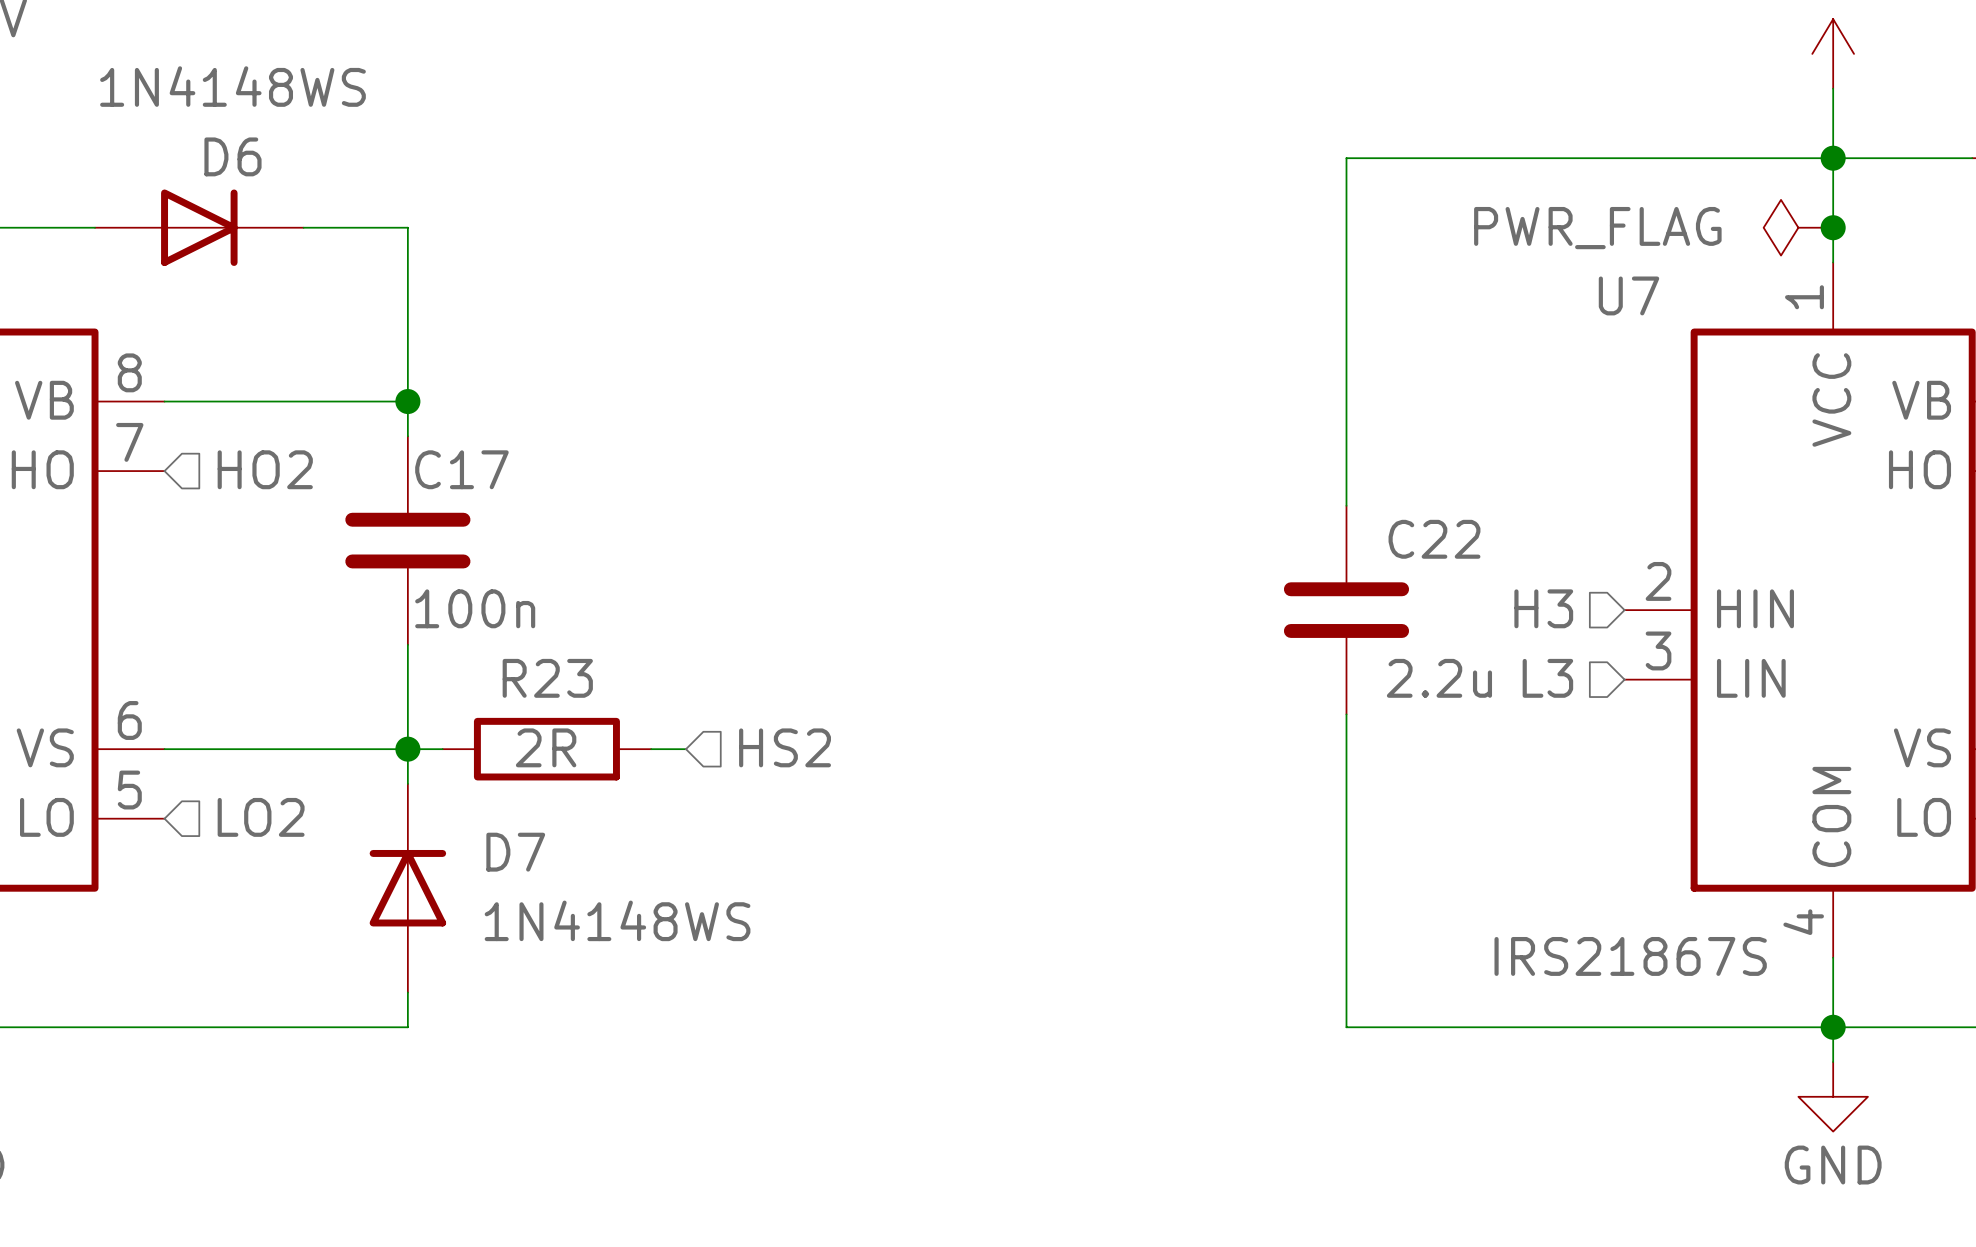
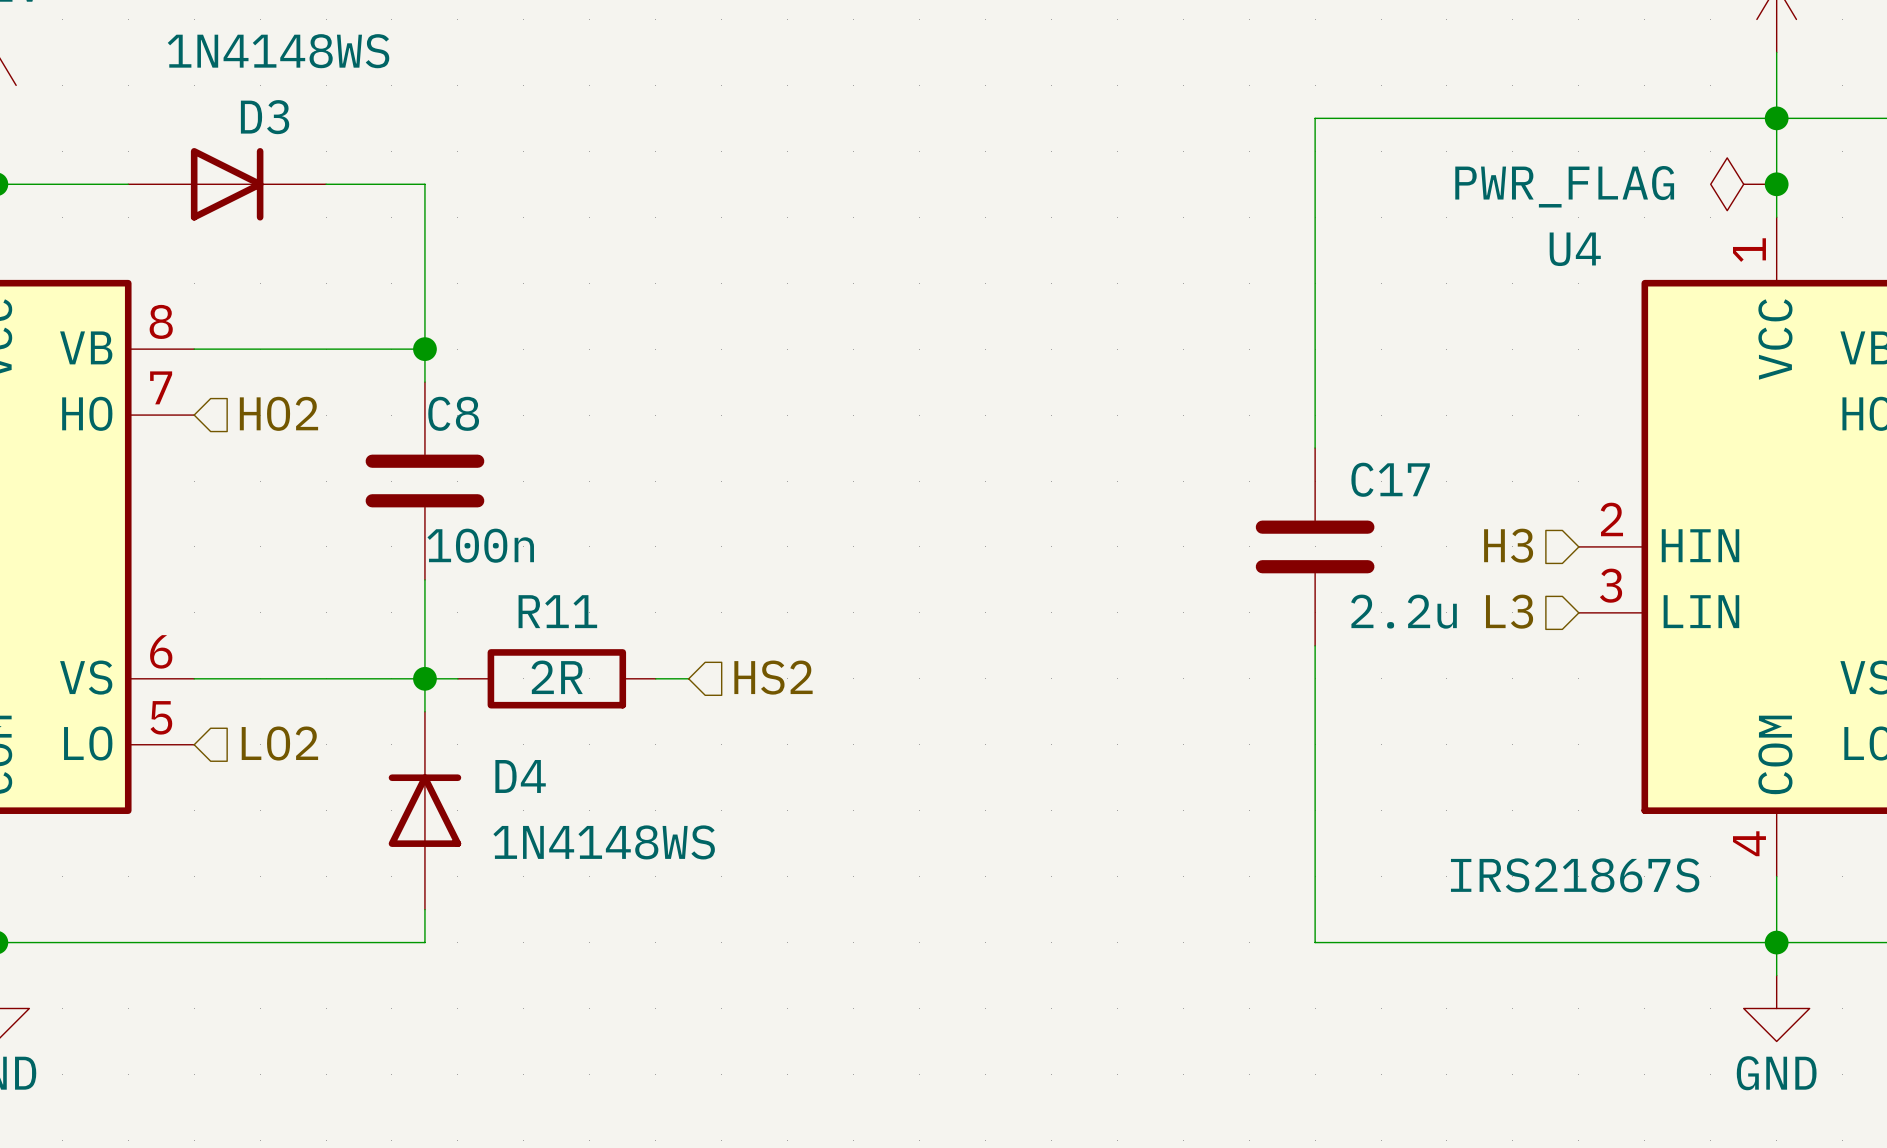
D6 name: D6 (232, 156) -> D3 (265, 117)
U7 name: U7 (1628, 295) -> U4 (1575, 249)
C17 name: C17 (461, 469) -> C8 (453, 413)
C22 name: C22 (1434, 539) -> C17 (1390, 479)
R23 name: R23 (547, 678) -> R11 (557, 611)
D7 name: D7 (515, 852) -> D4 (520, 776)

